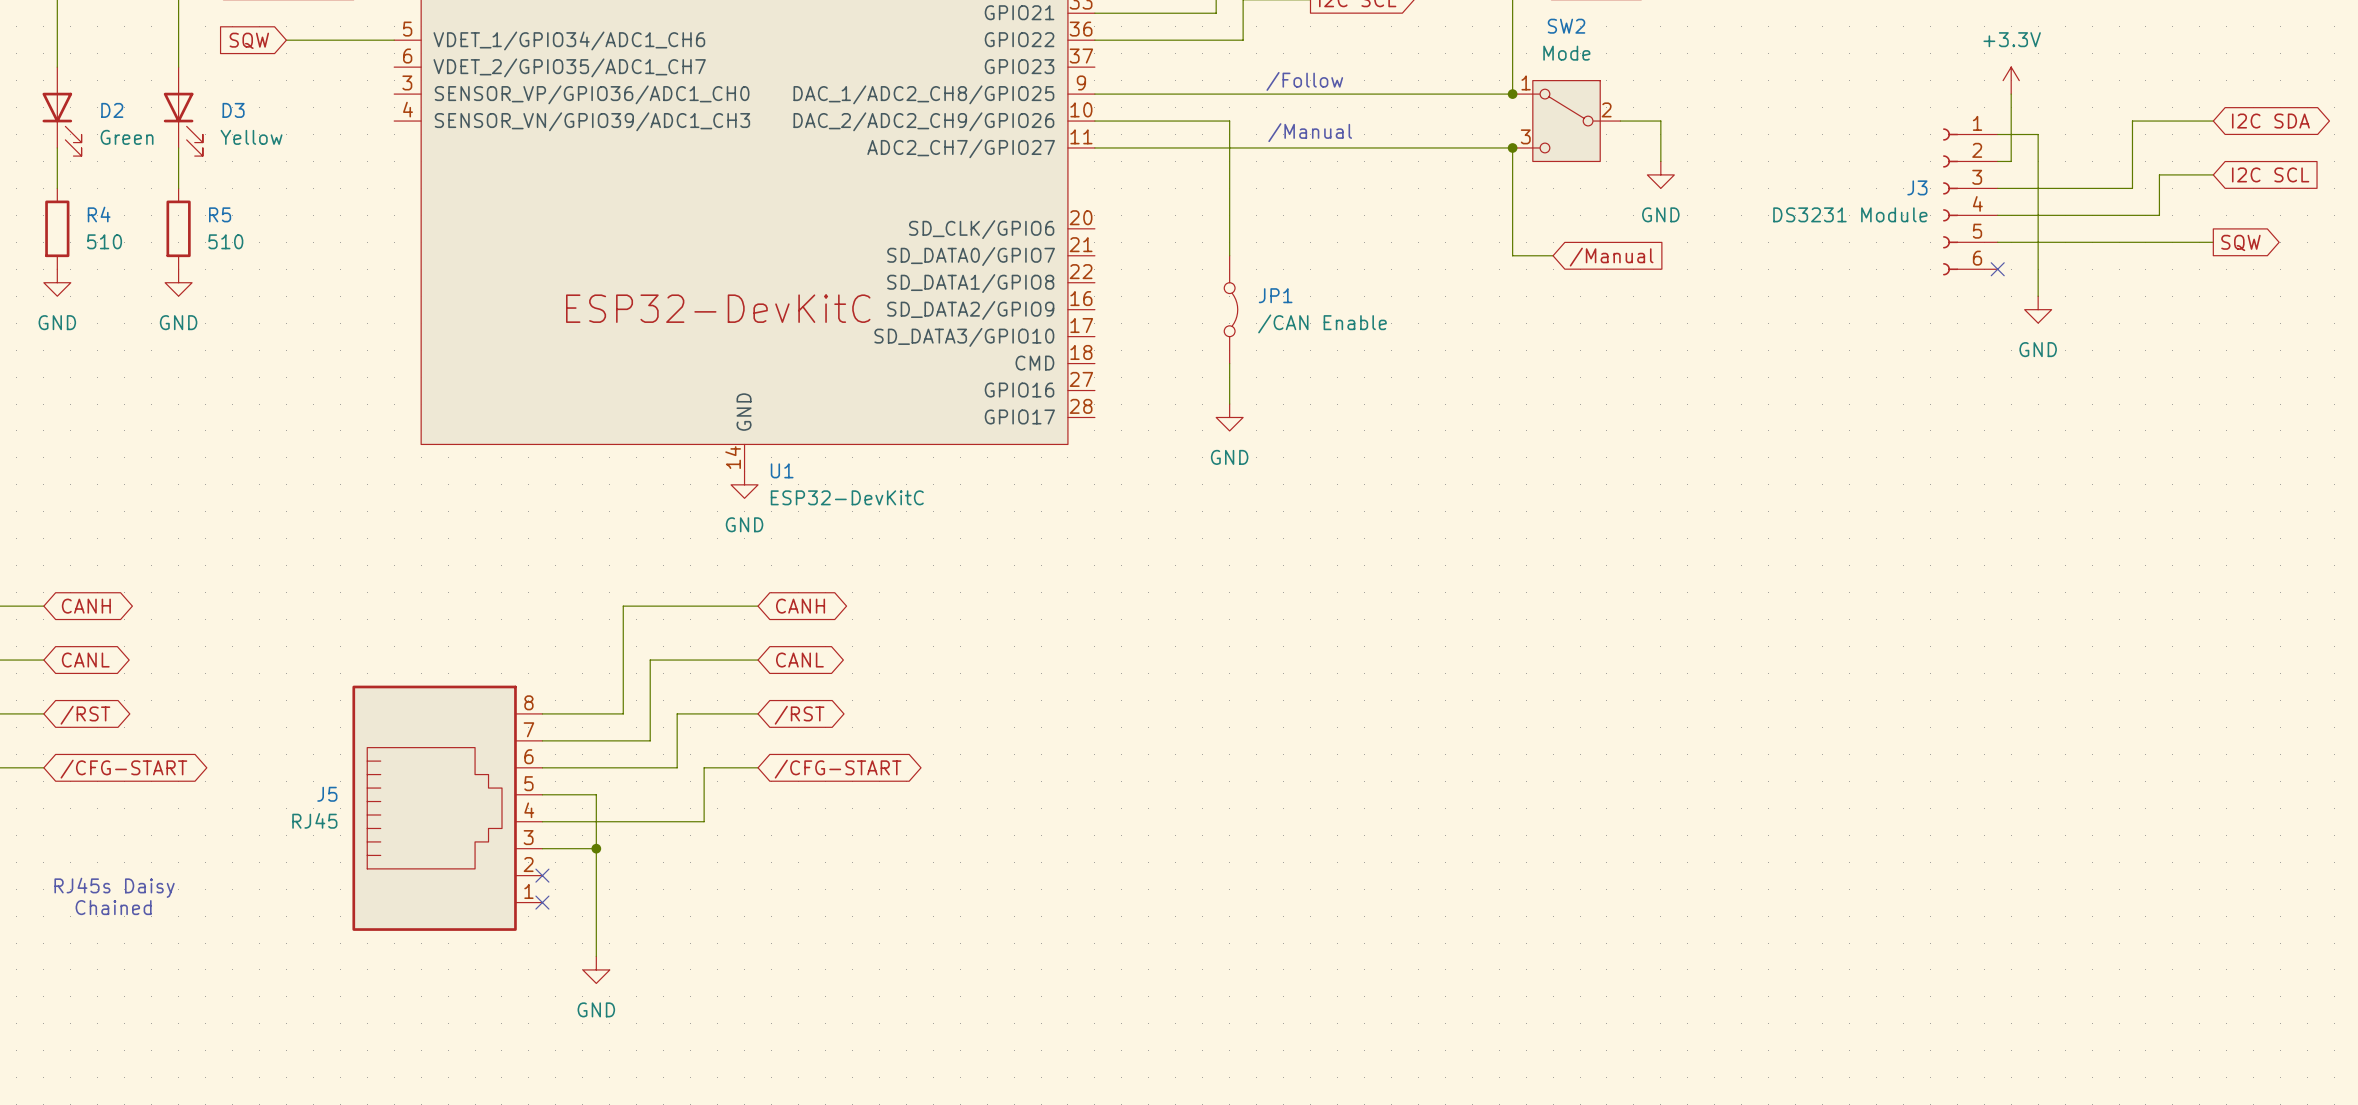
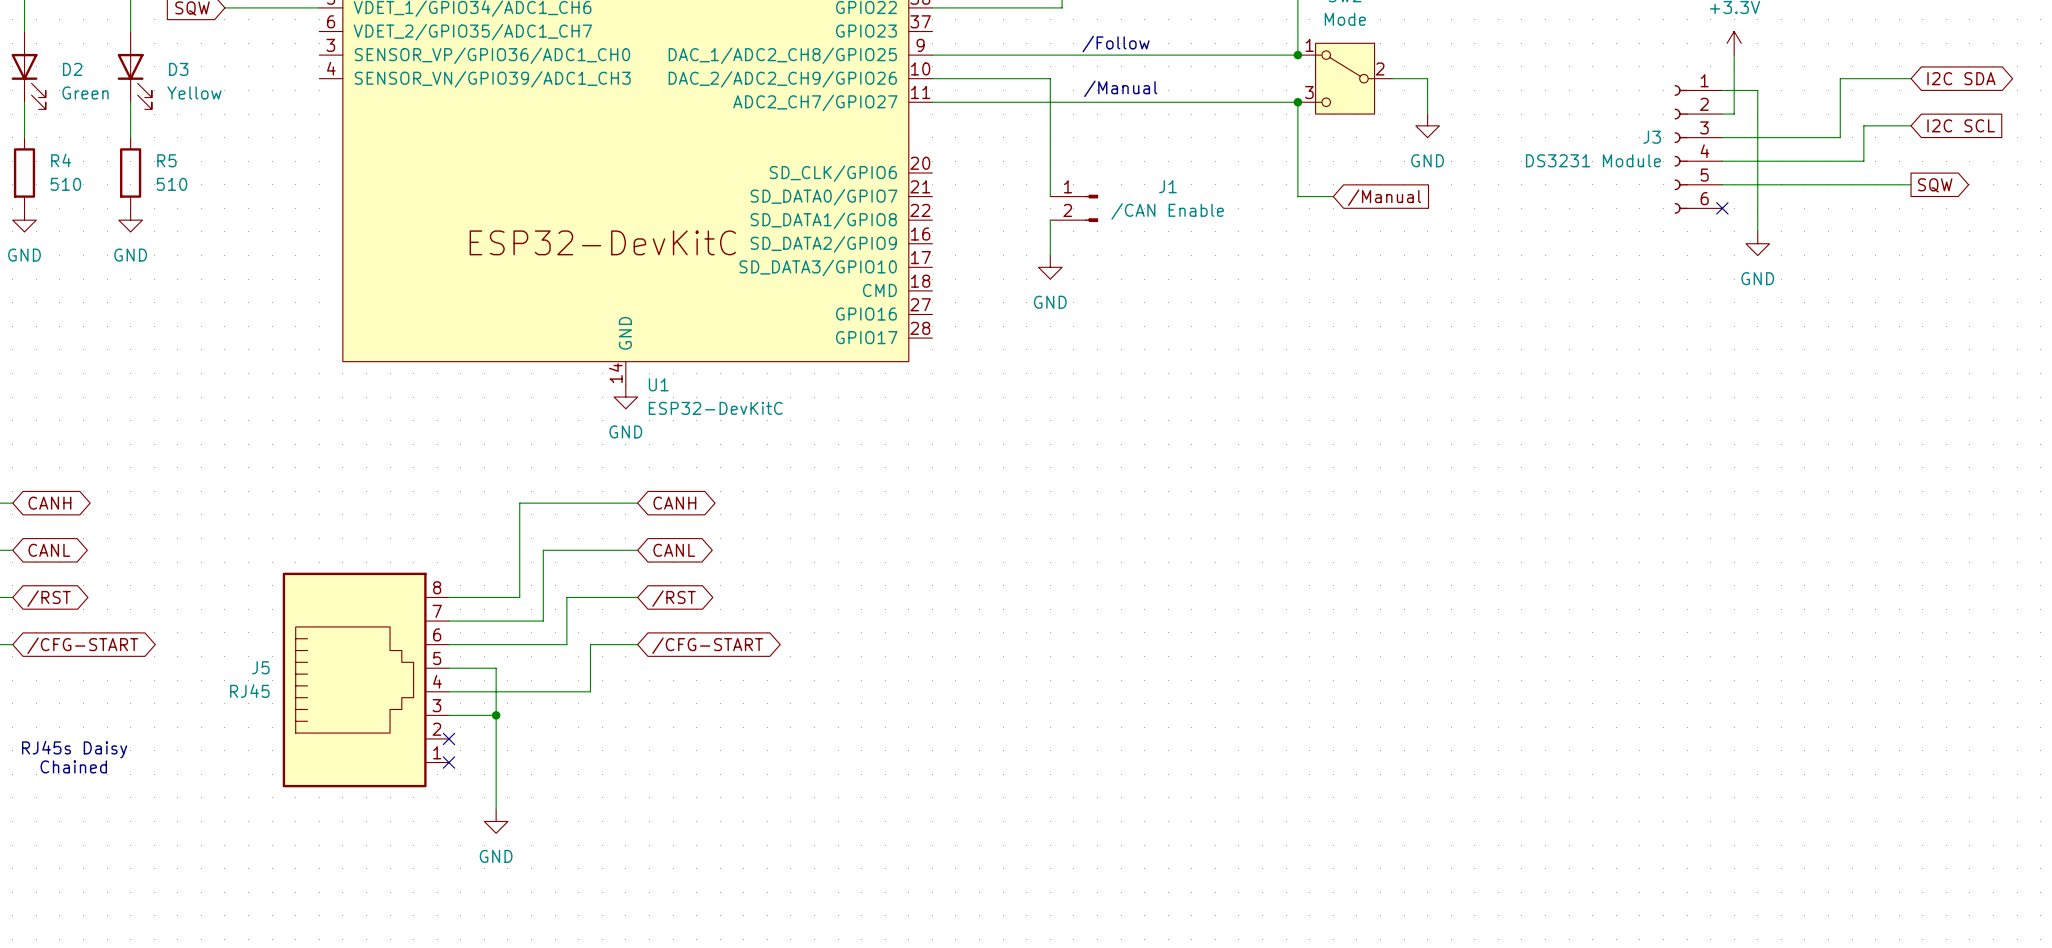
J1: none -> /CAN Enable (1074, 208)
JP1: /CAN Enable (1230, 309) -> none
wire: (1229, 363) (1229, 404) -> (1050, 220) (1050, 255)
power symbol position: GND (1229, 417) -> GND (1050, 267)

